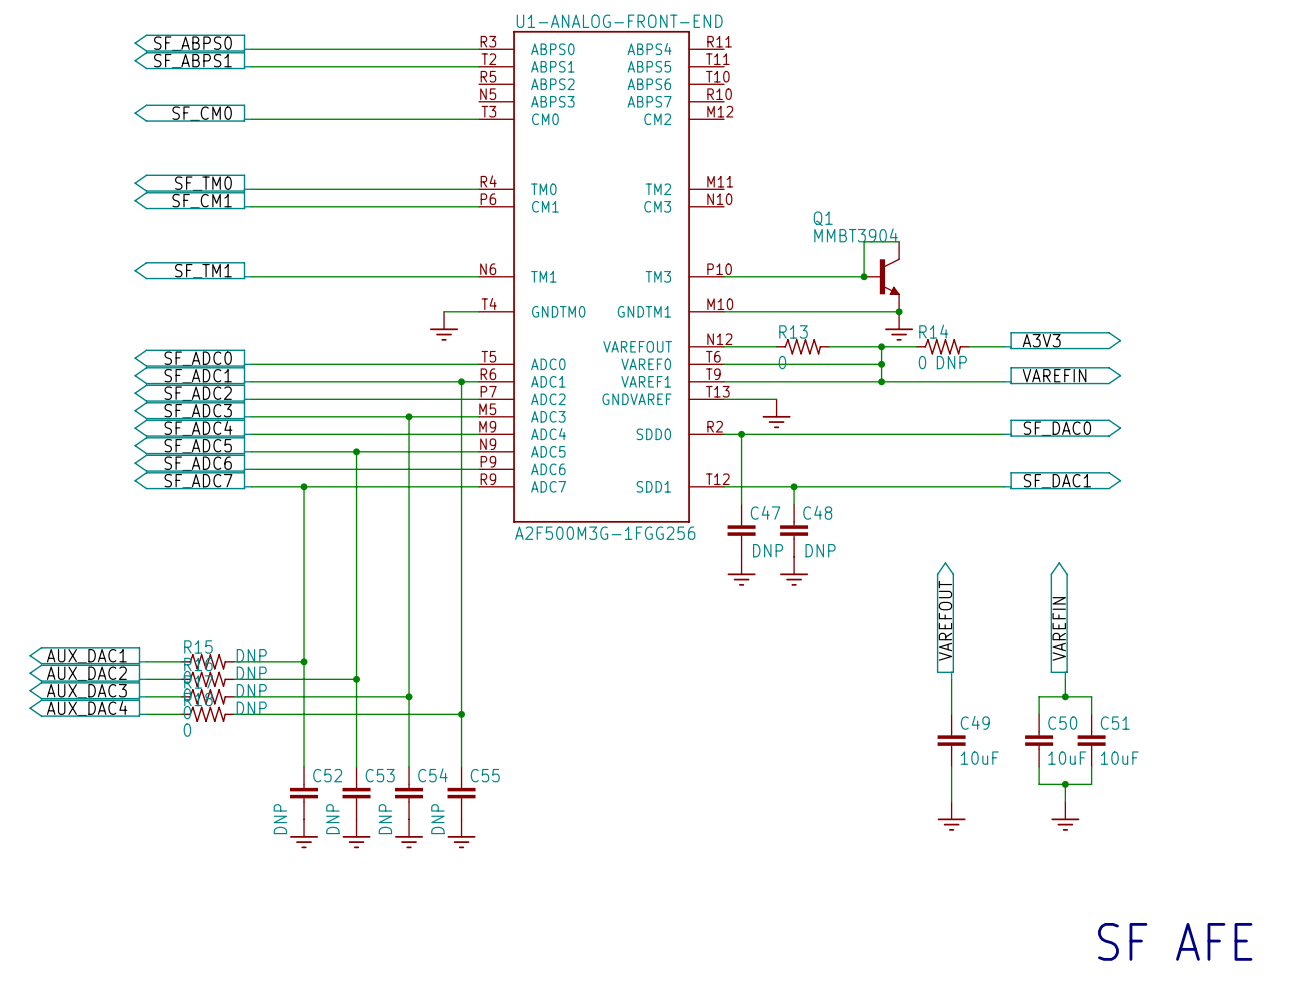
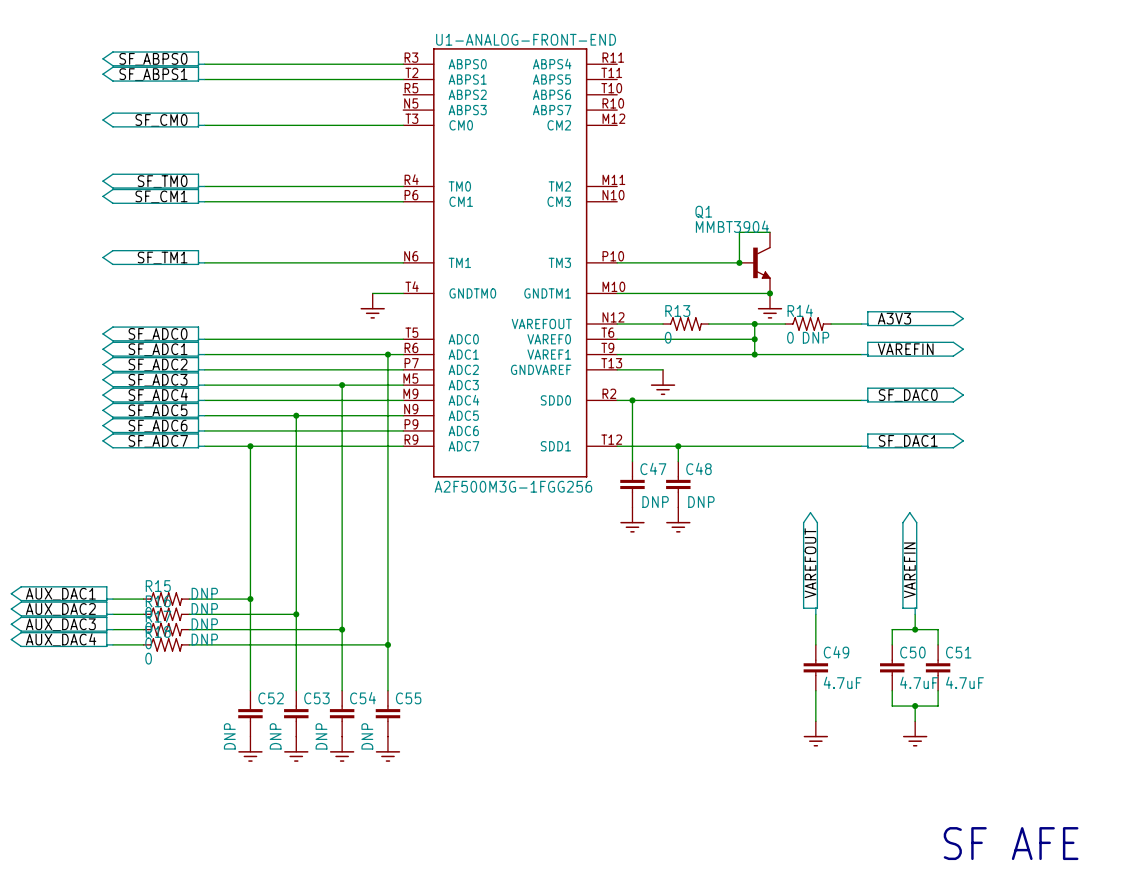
C49 value: 10uF (979, 758) -> 4.7uF (842, 682)
C50 value: 10uF (1067, 758) -> 4.7uF (919, 682)
C51 value: 10uF (1119, 758) -> 4.7uF (964, 682)

